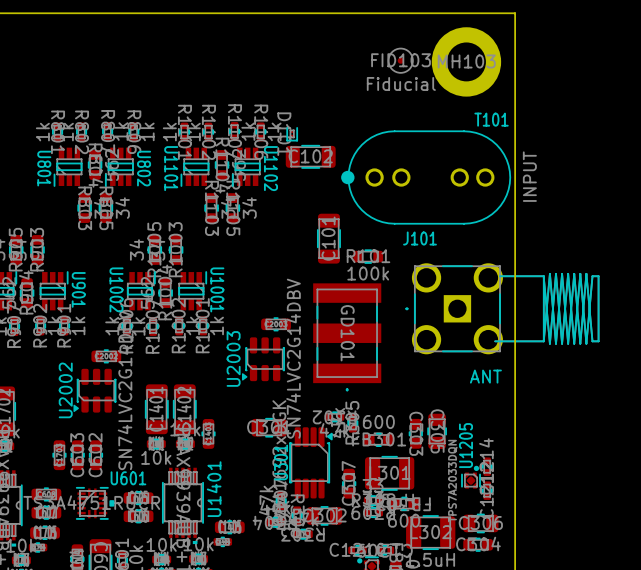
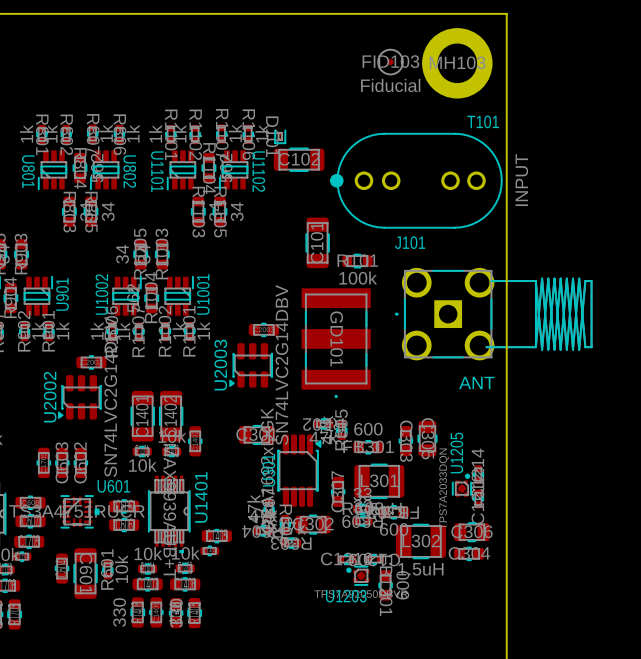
U901 name rotation: 0° (78, 289) -> 180° (62, 294)
U1002 name rotation: 0° (116, 289) -> 180° (101, 294)
U1001 name rotation: 0° (217, 289) -> 180° (203, 294)

